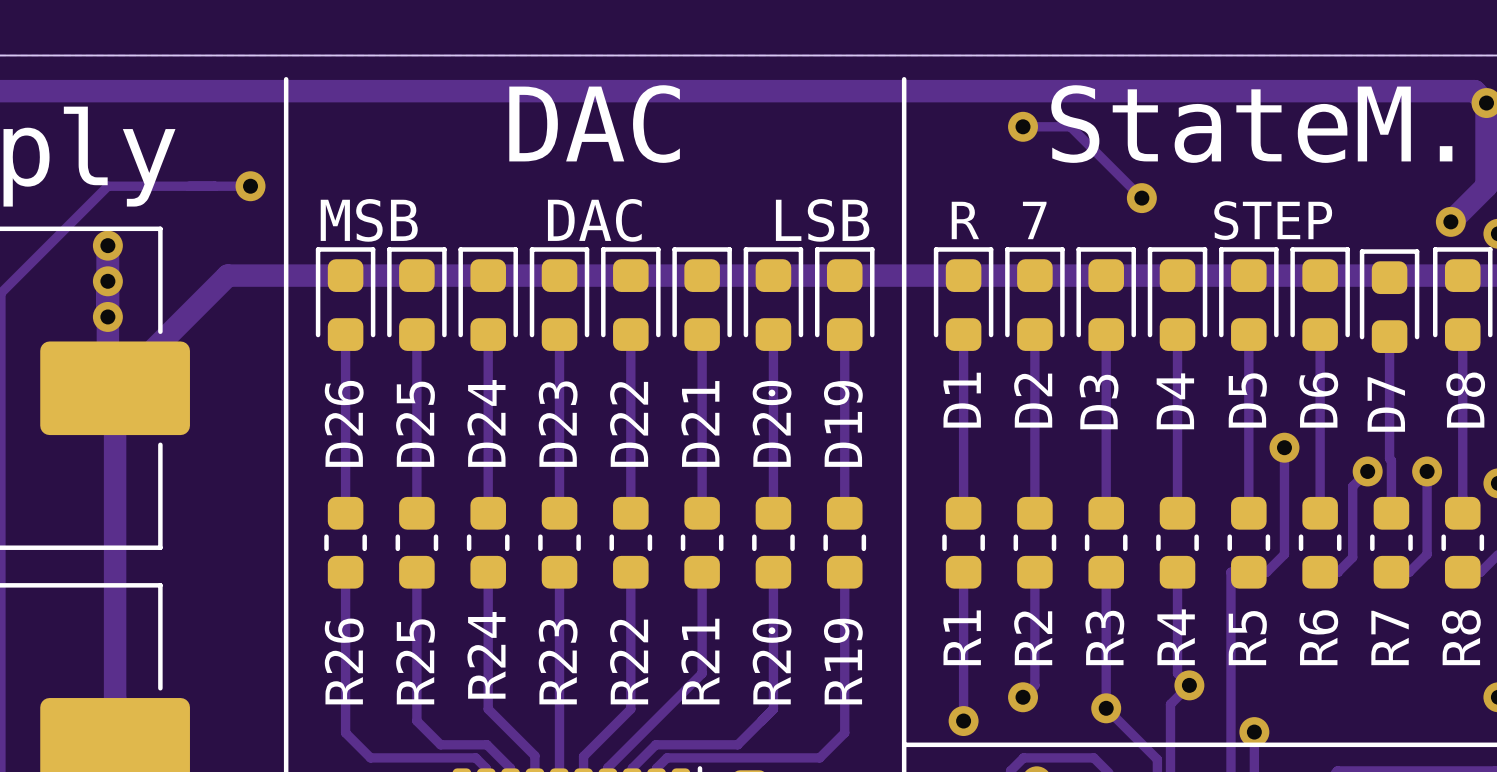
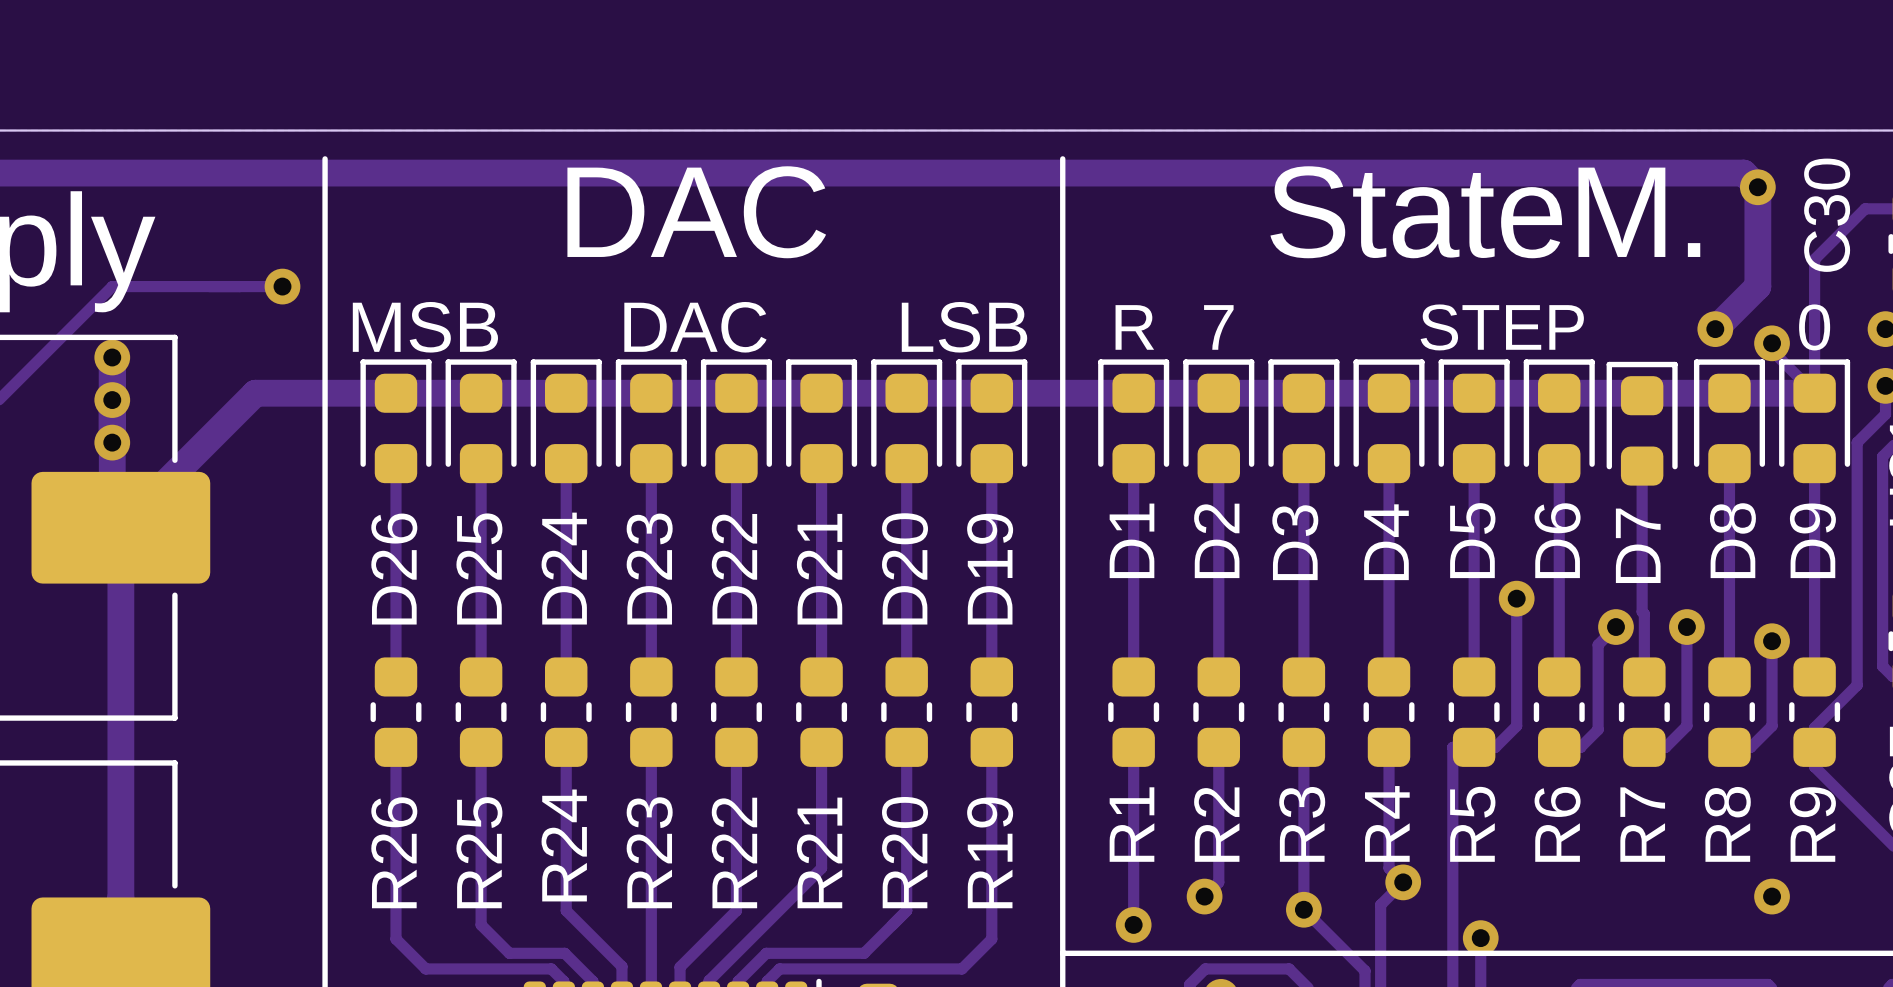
track: (1023, 126) (1070, 126) (1141, 198) -> none
via: (1023, 126) -> none
via: (1141, 198) -> none

